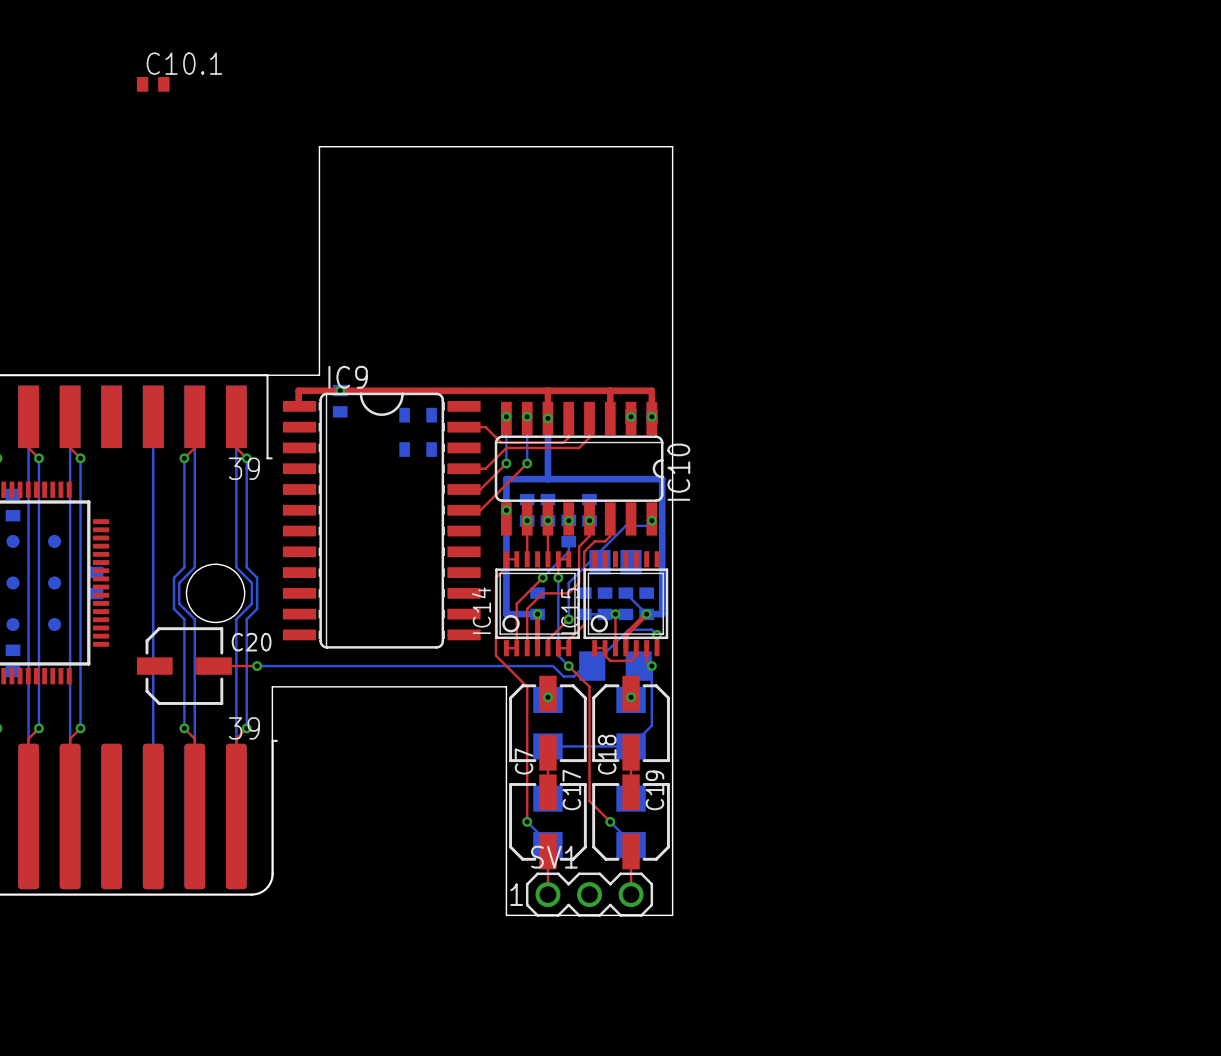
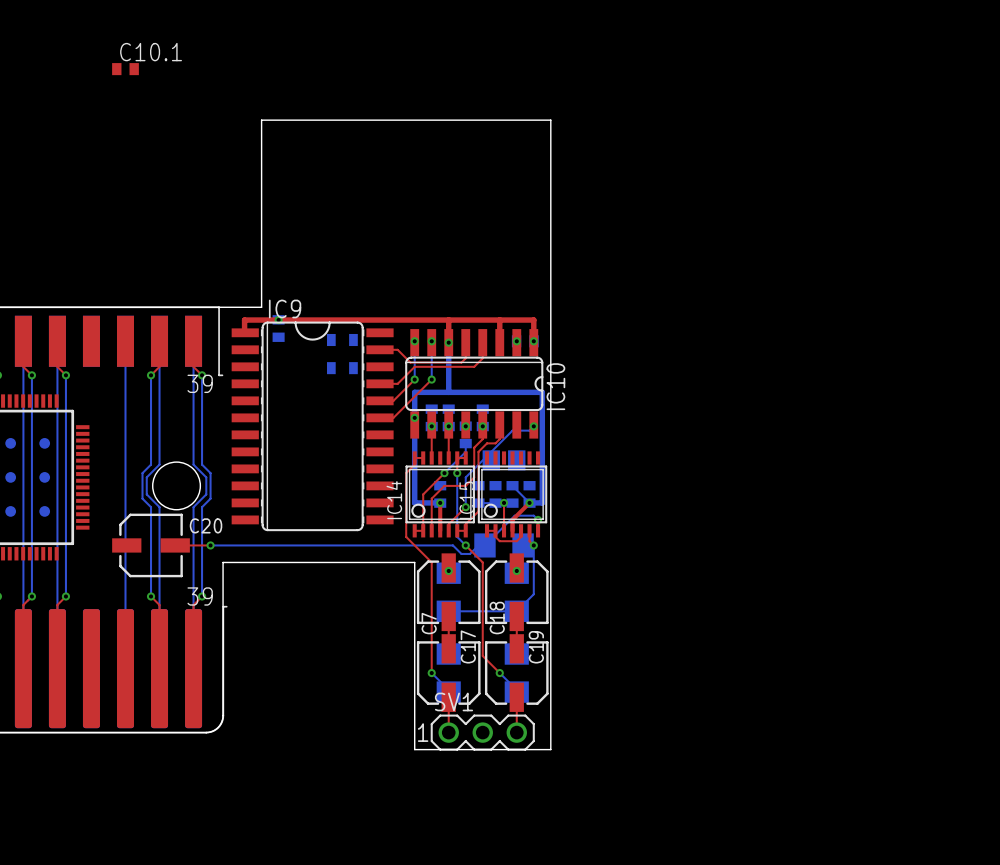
part: (13, 505) -> none
part: (96, 582) -> none
part: (13, 660) -> none

